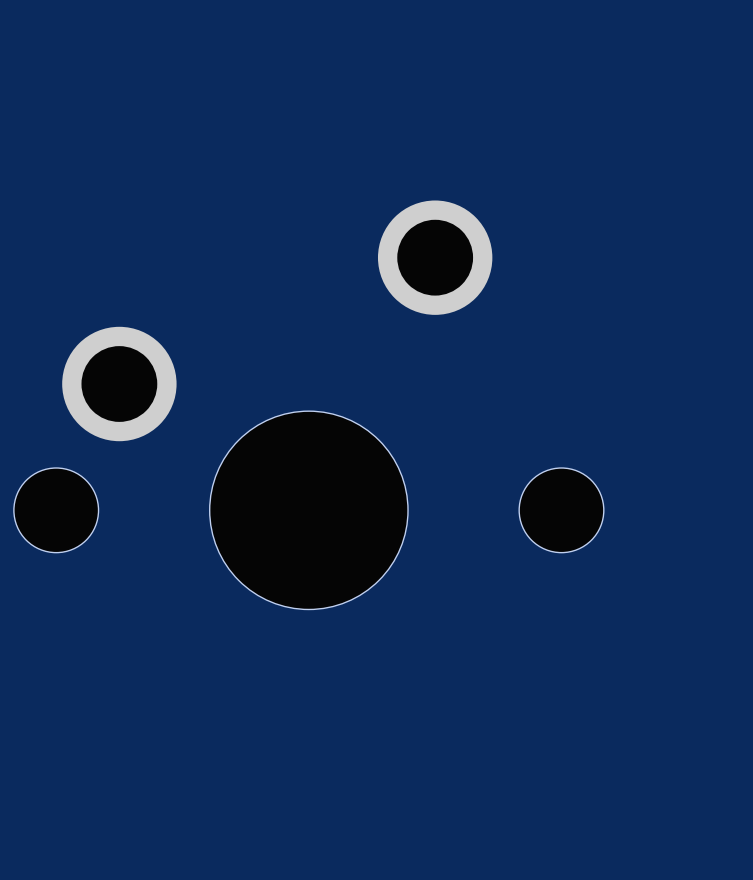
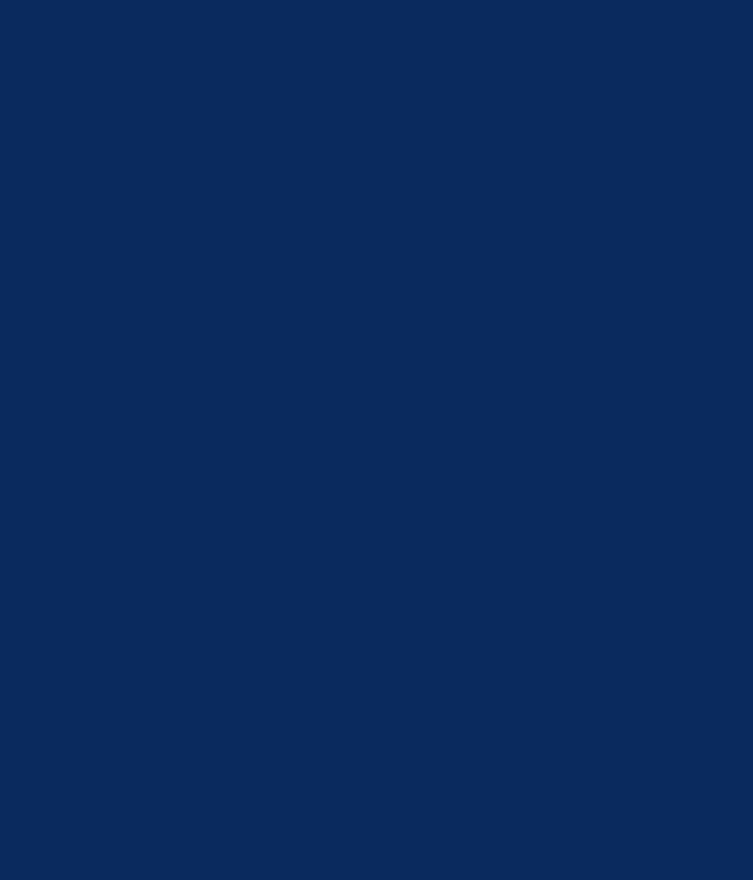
part: (308, 404) -> none

